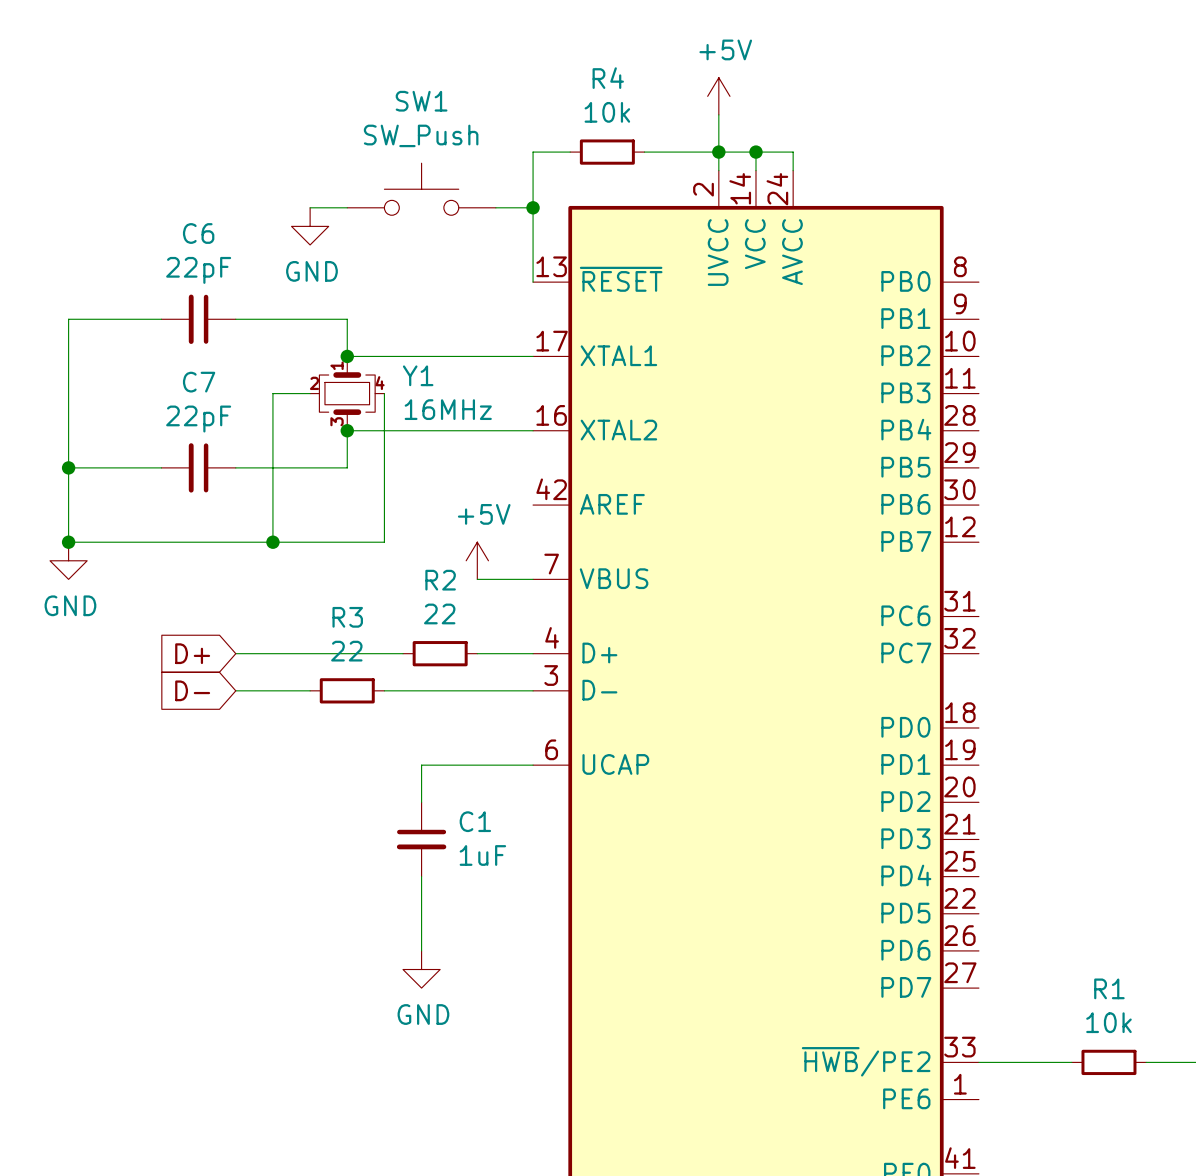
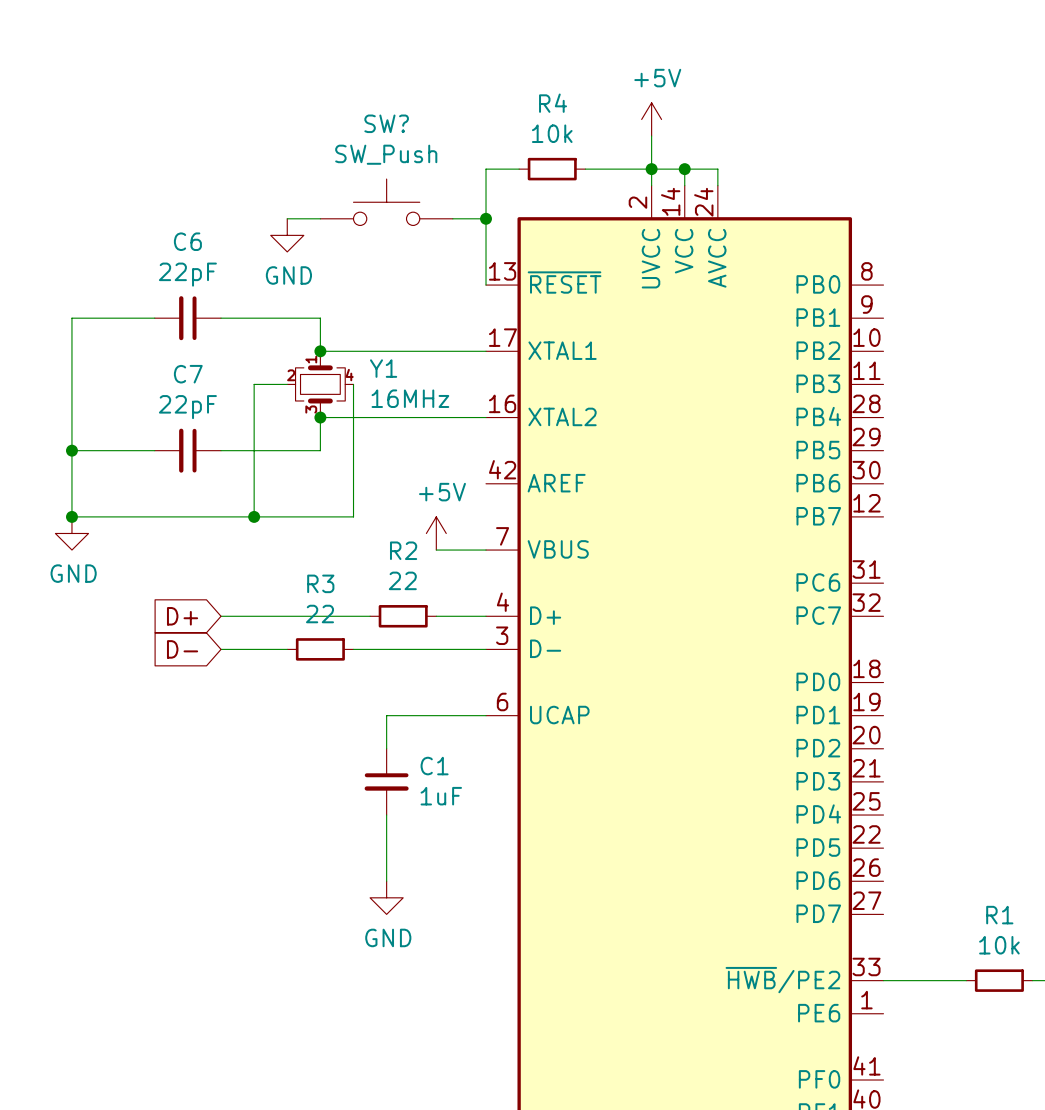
SW1 name: SW1 (421, 101) -> SW? (386, 123)

